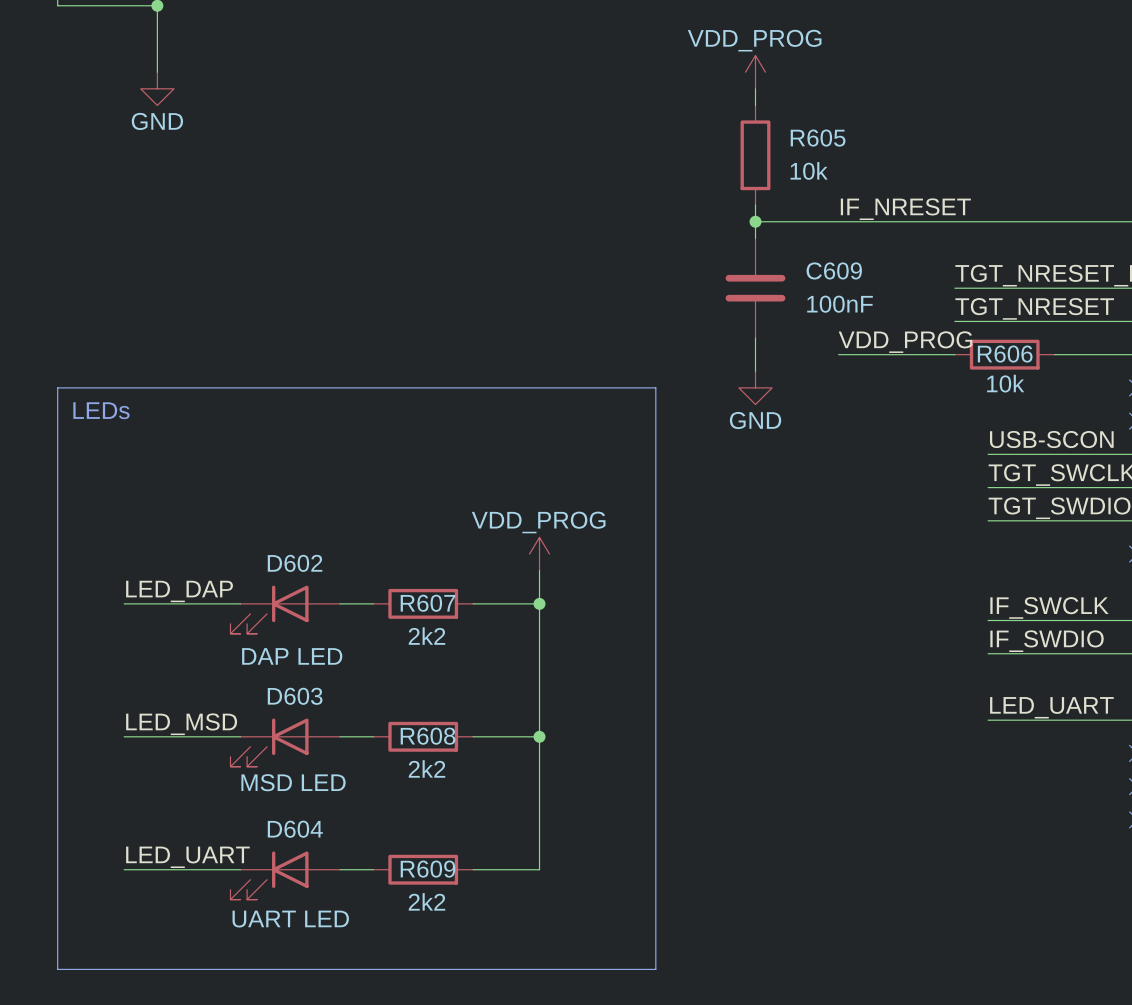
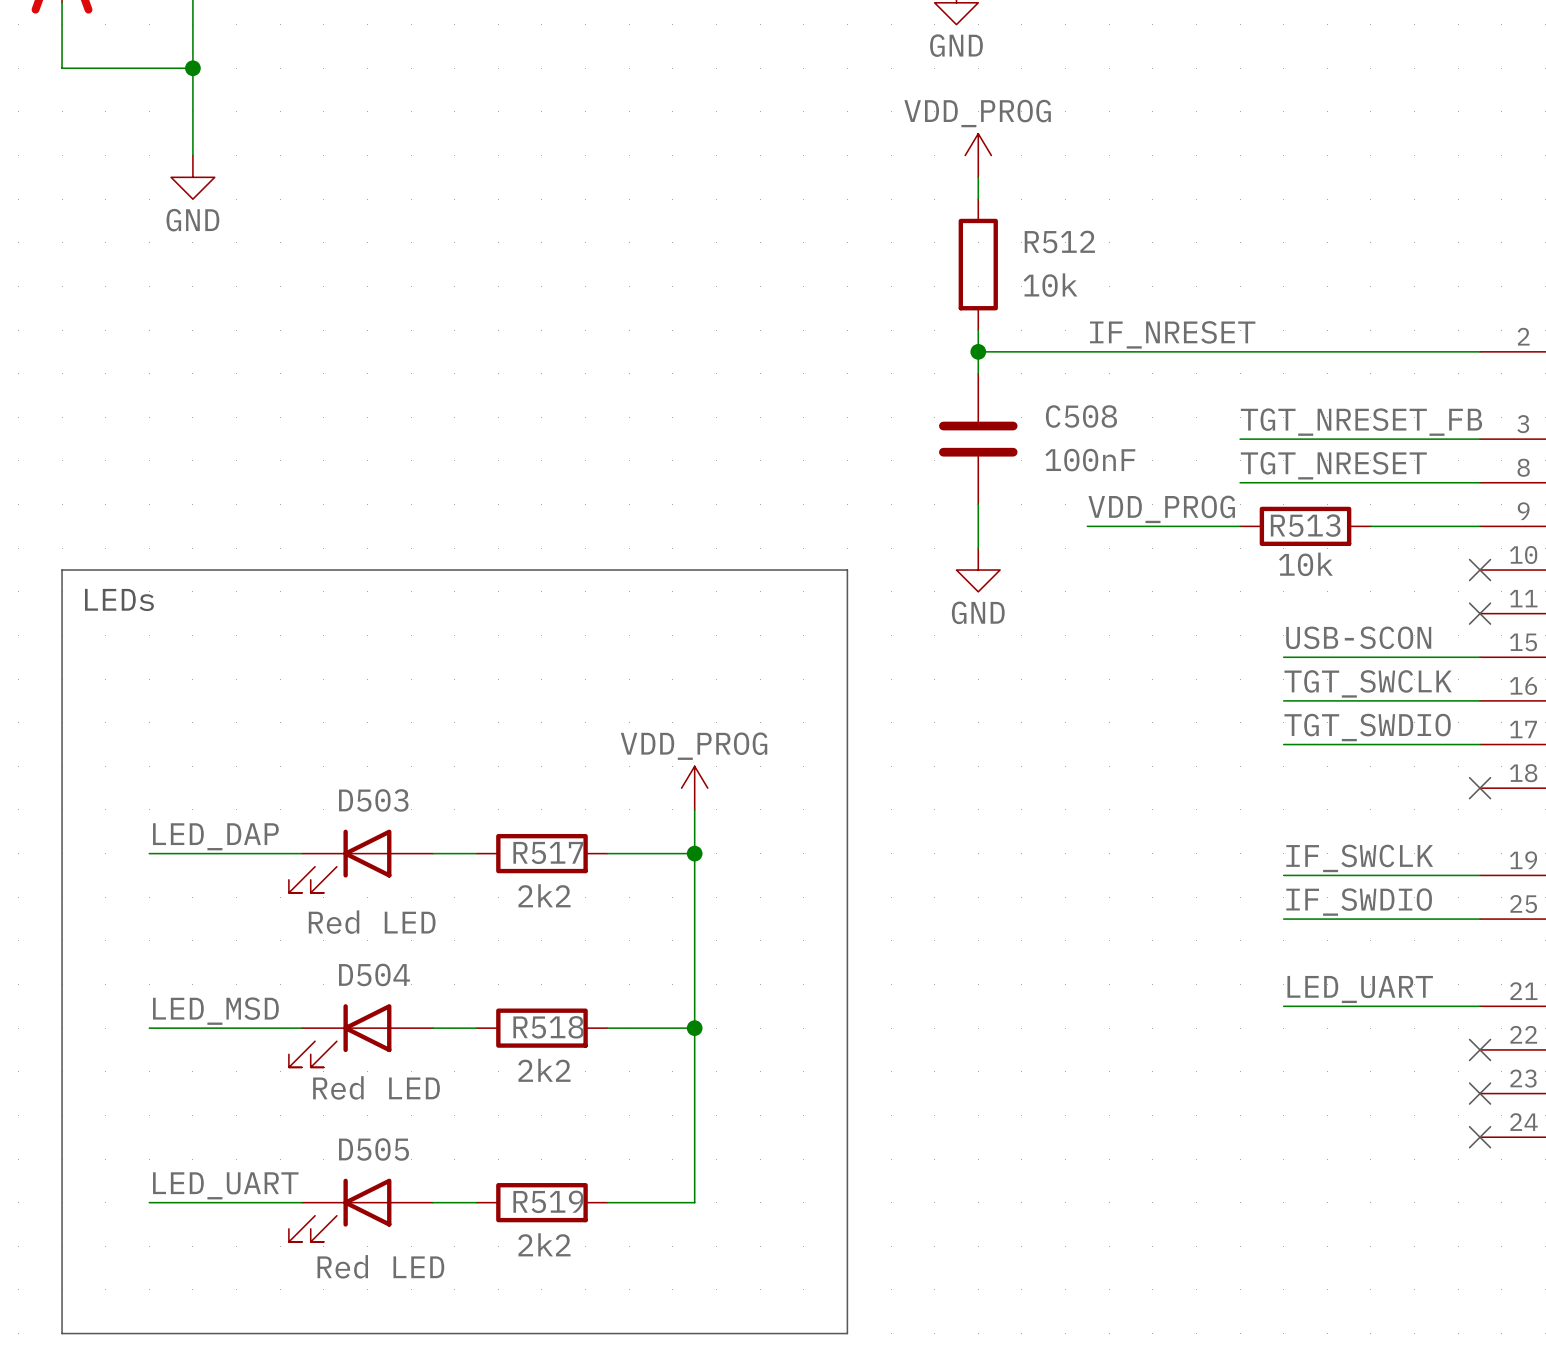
R605 name: R605 (818, 138) -> R512 (1059, 241)
C609 name: C609 (834, 270) -> C508 (1081, 416)
R606 name: R606 (1005, 354) -> R513 (1305, 525)
D602 name: D602 (295, 563) -> D503 (373, 800)
R607 name: R607 (427, 603) -> R517 (548, 852)
D602 value: DAP LED (292, 656) -> Red LED (372, 922)
D603 name: D603 (295, 696) -> D504 (374, 974)
R608 name: R608 (428, 736) -> R518 (548, 1027)
D603 value: MSD LED (293, 782) -> Red LED (376, 1087)
D604 name: D604 (295, 829) -> D505 (374, 1149)
R609 name: R609 (427, 869) -> R519 (548, 1201)
D604 value: UART LED (290, 919) -> Red LED (380, 1266)

